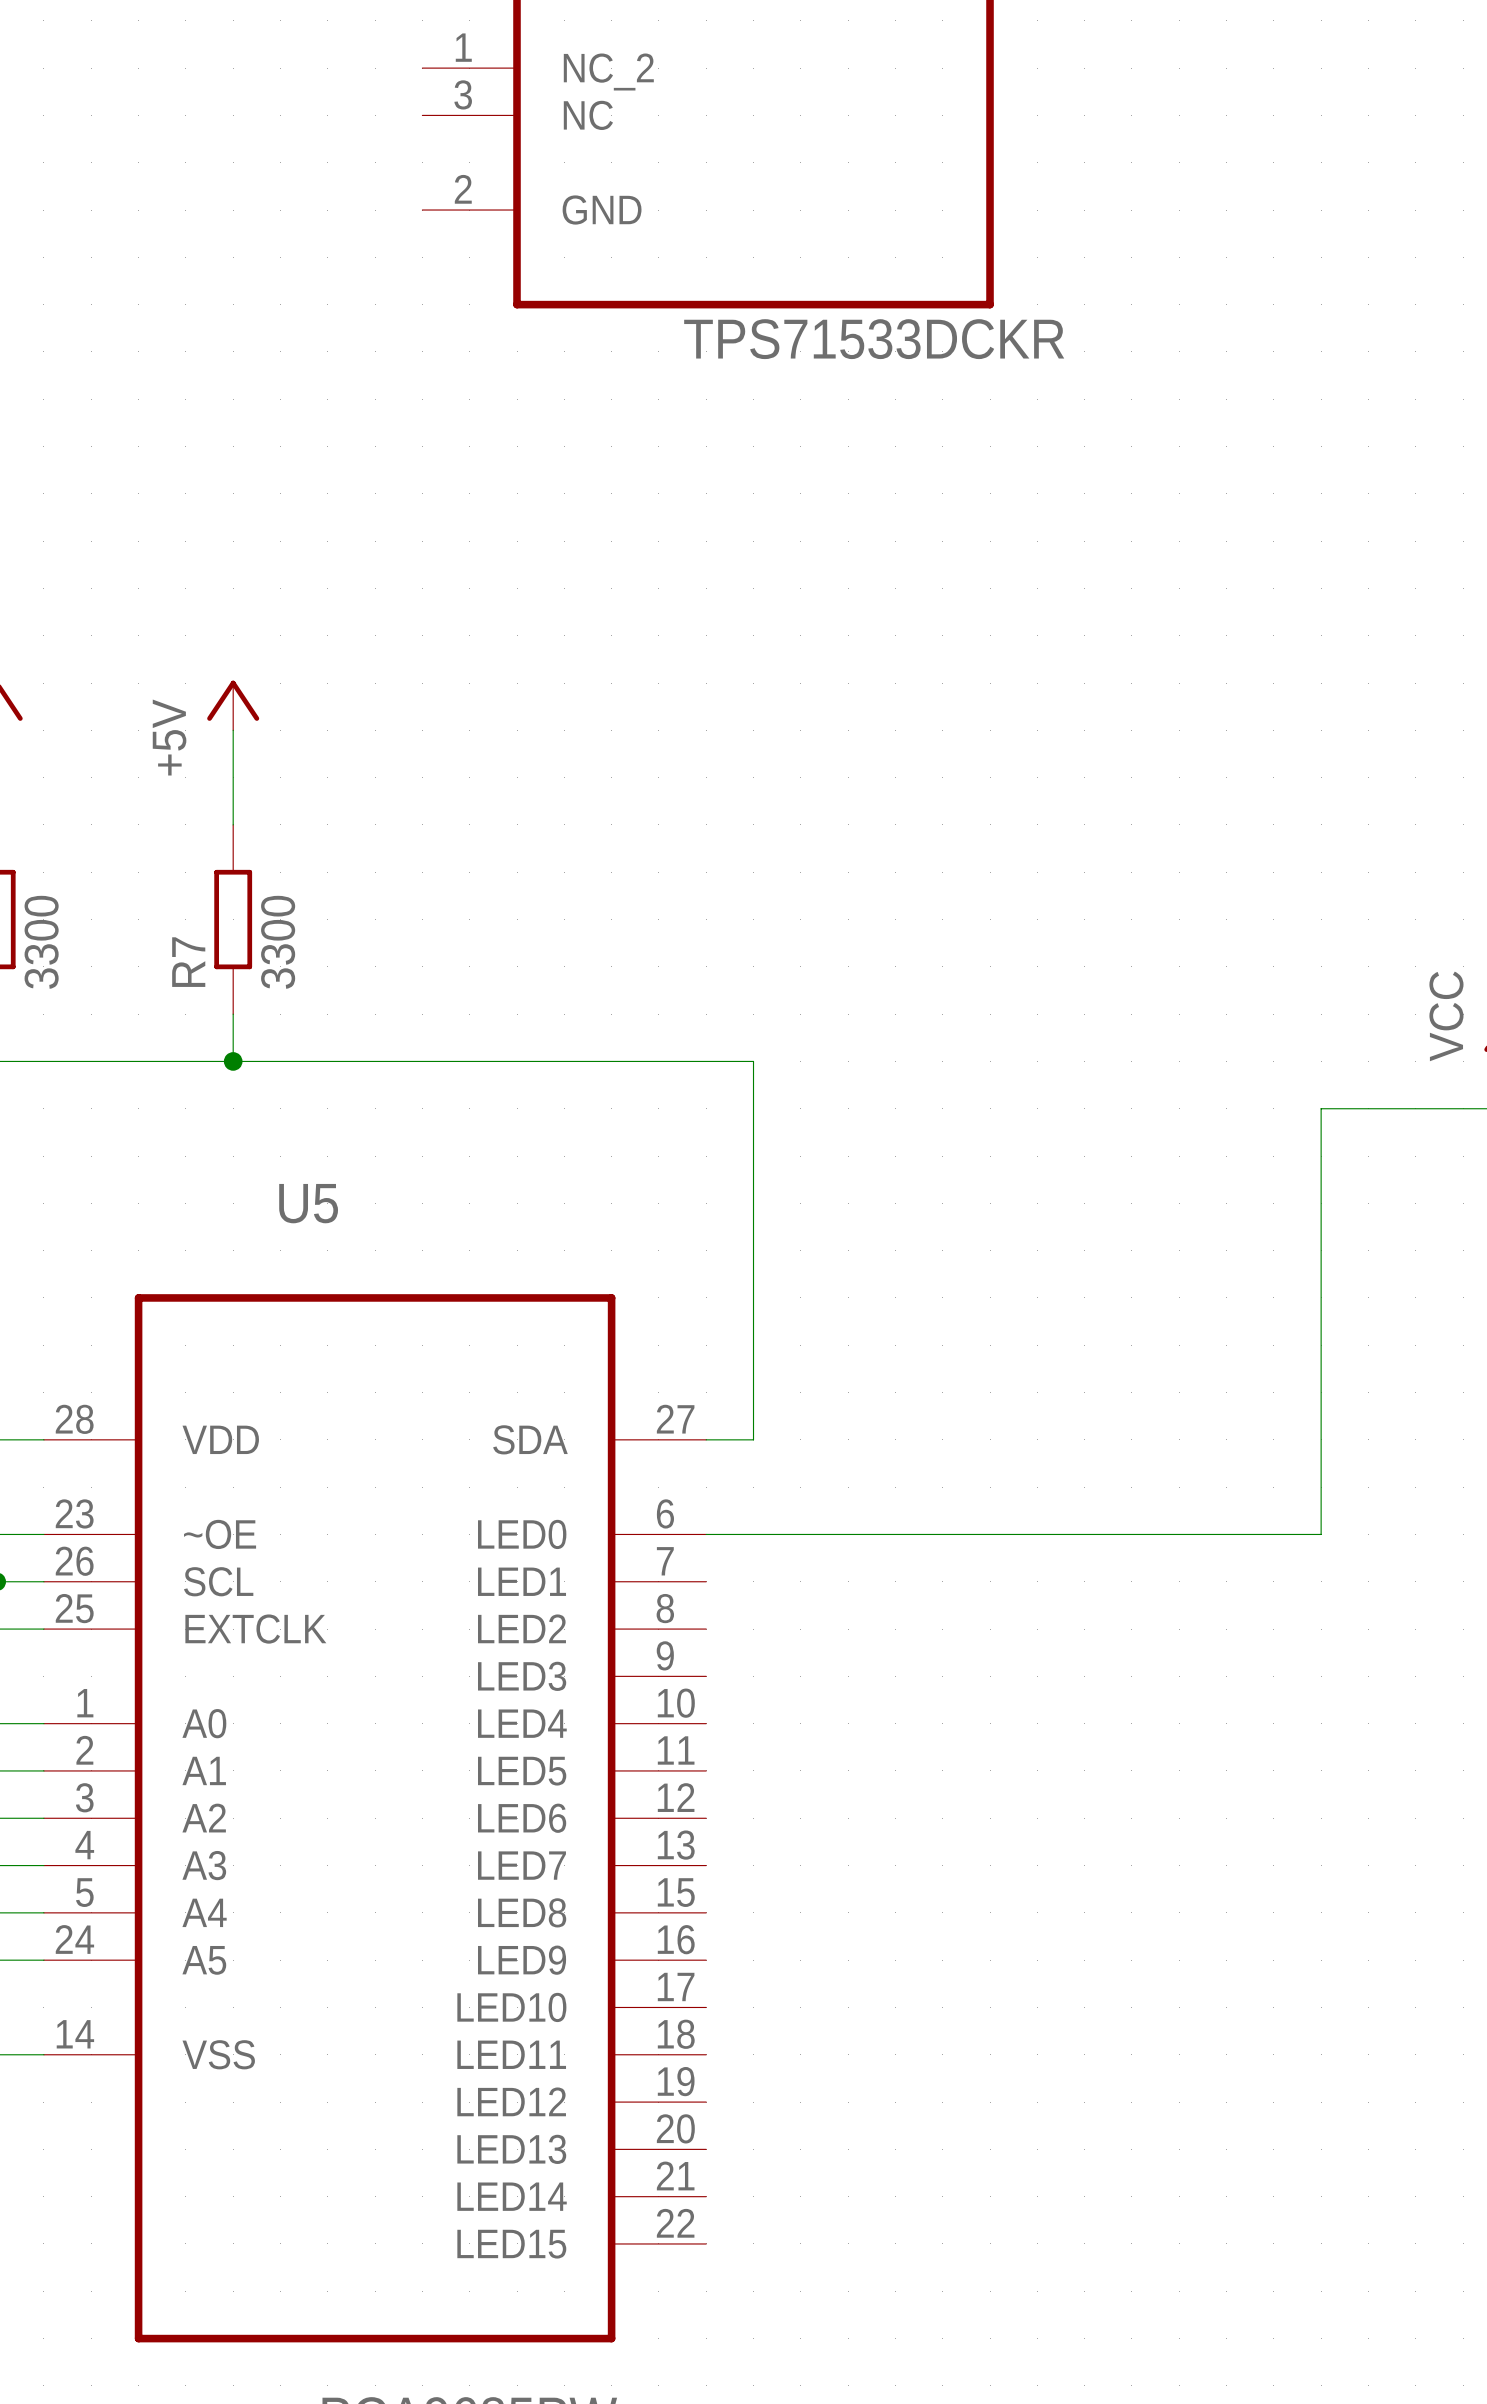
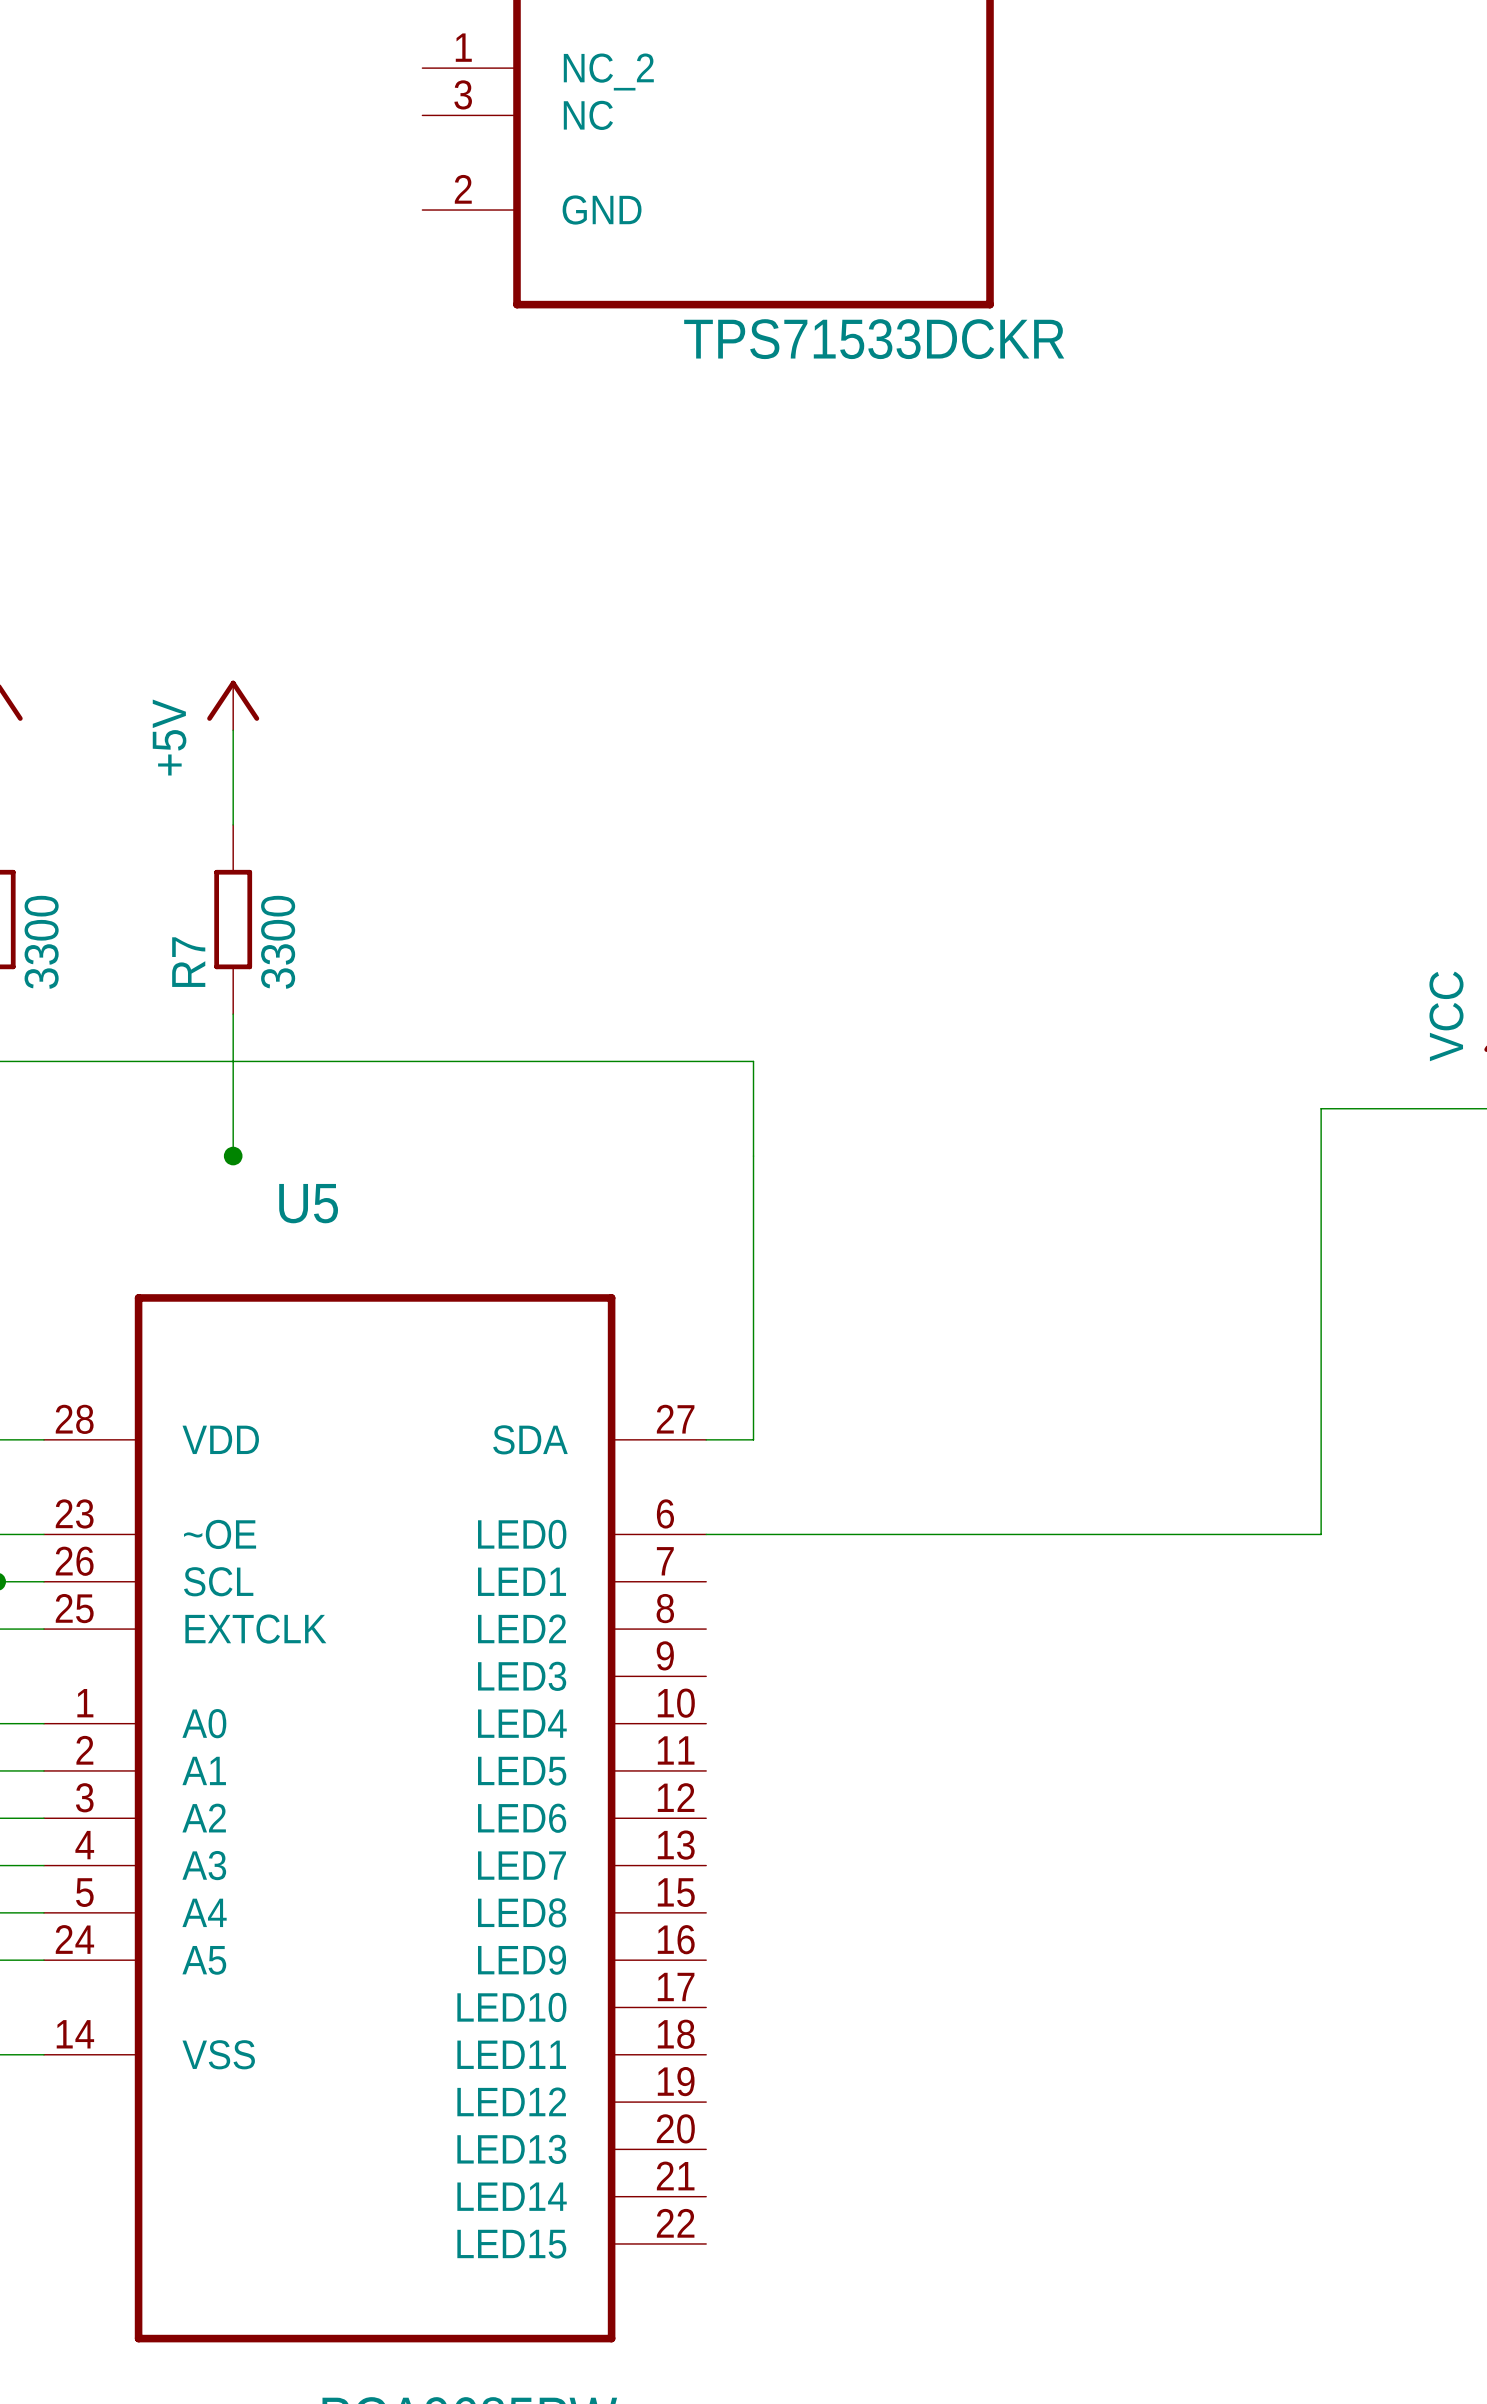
wire: none -> (233, 1061) (233, 1156)
junction position: (233, 1061) -> (233, 1156)

